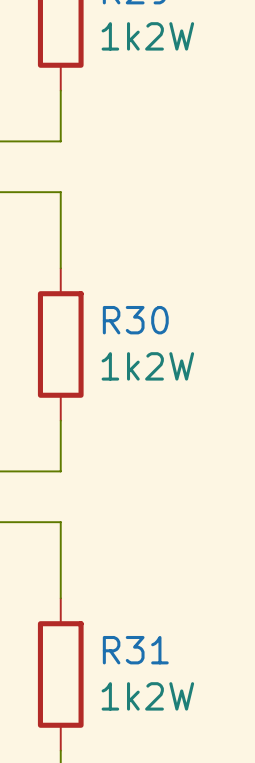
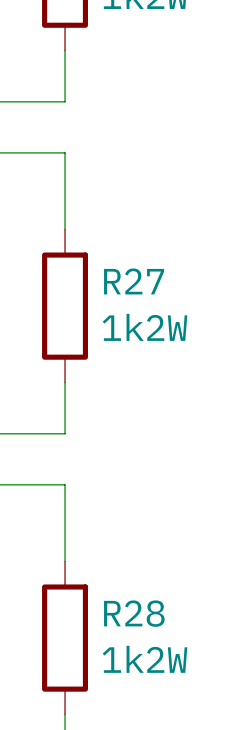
R30 name: R30 (135, 320) -> R27 (134, 281)
R31 name: R31 (135, 650) -> R28 (134, 613)

